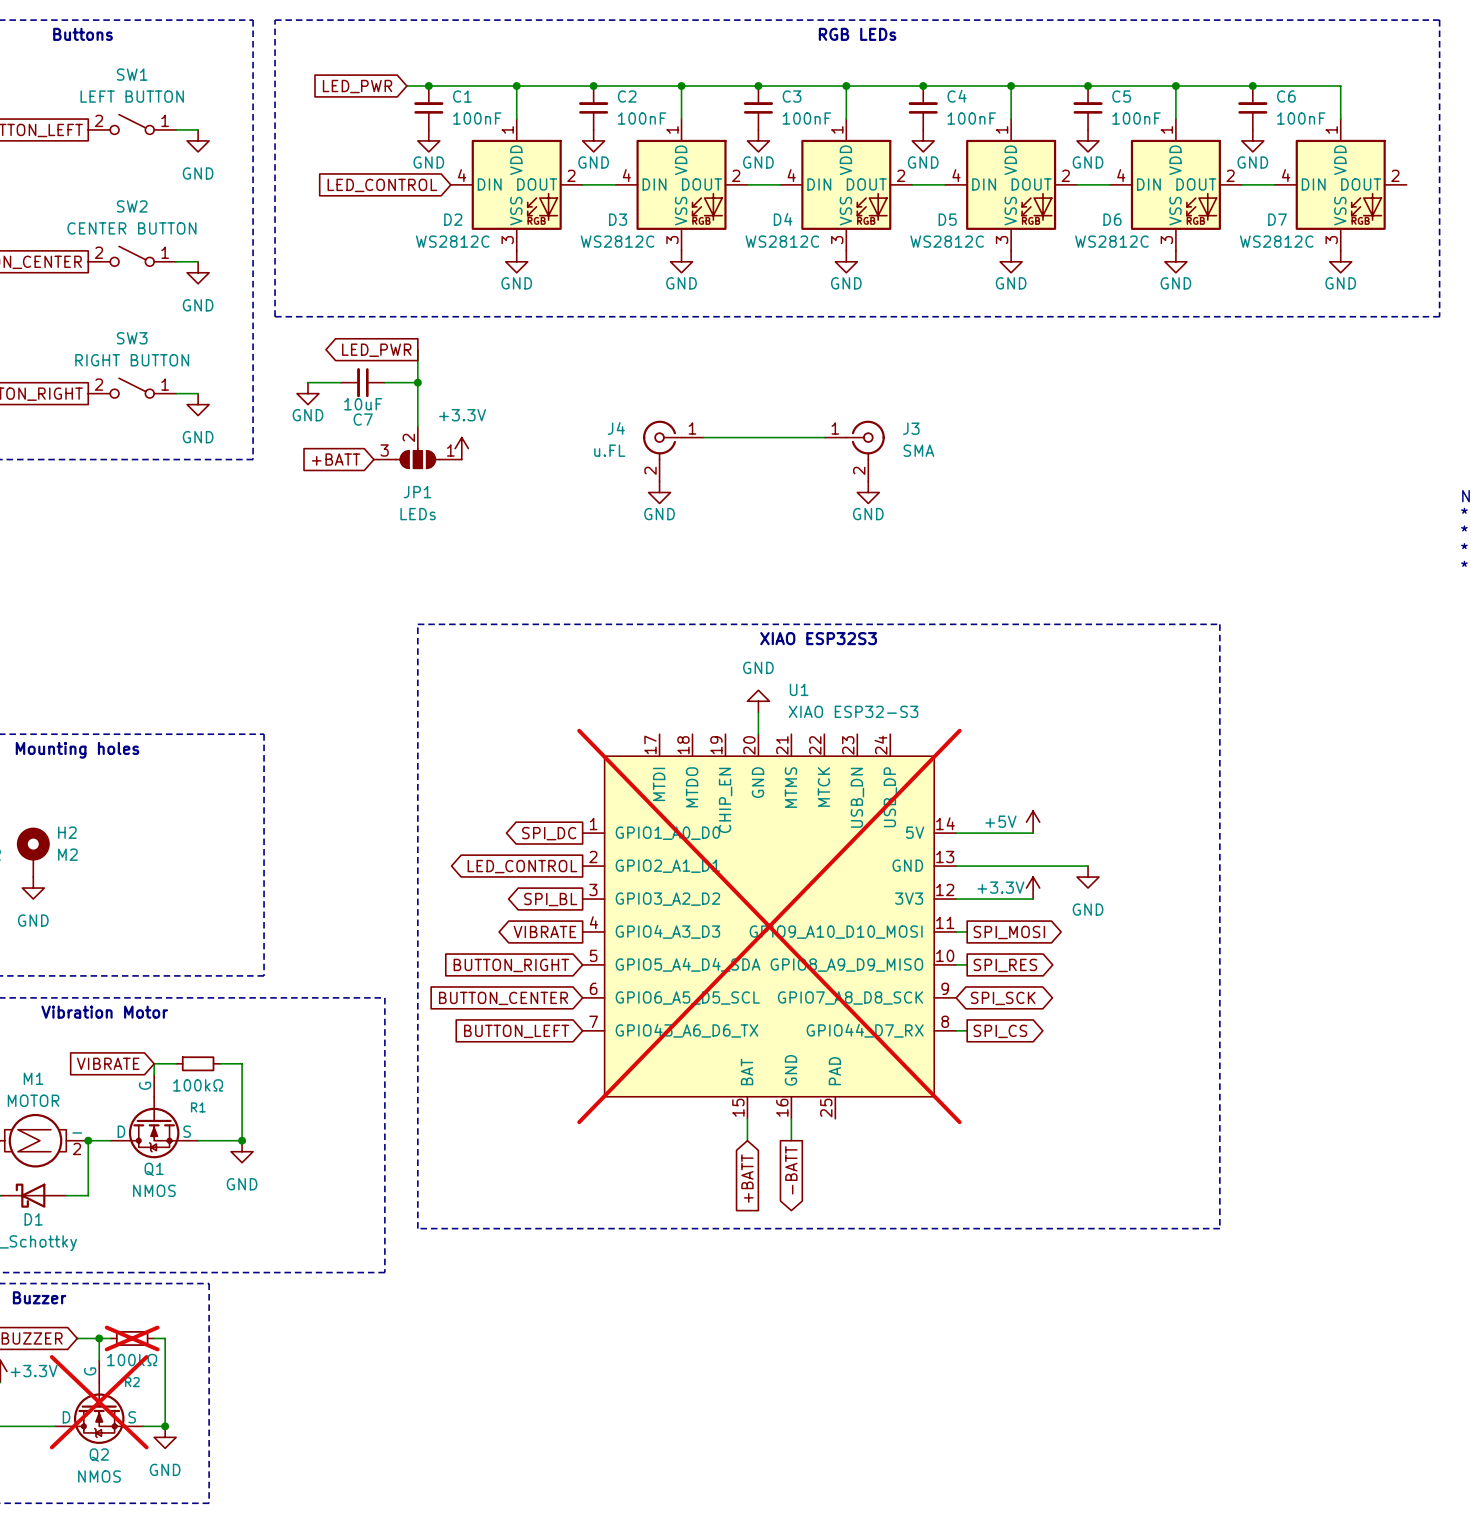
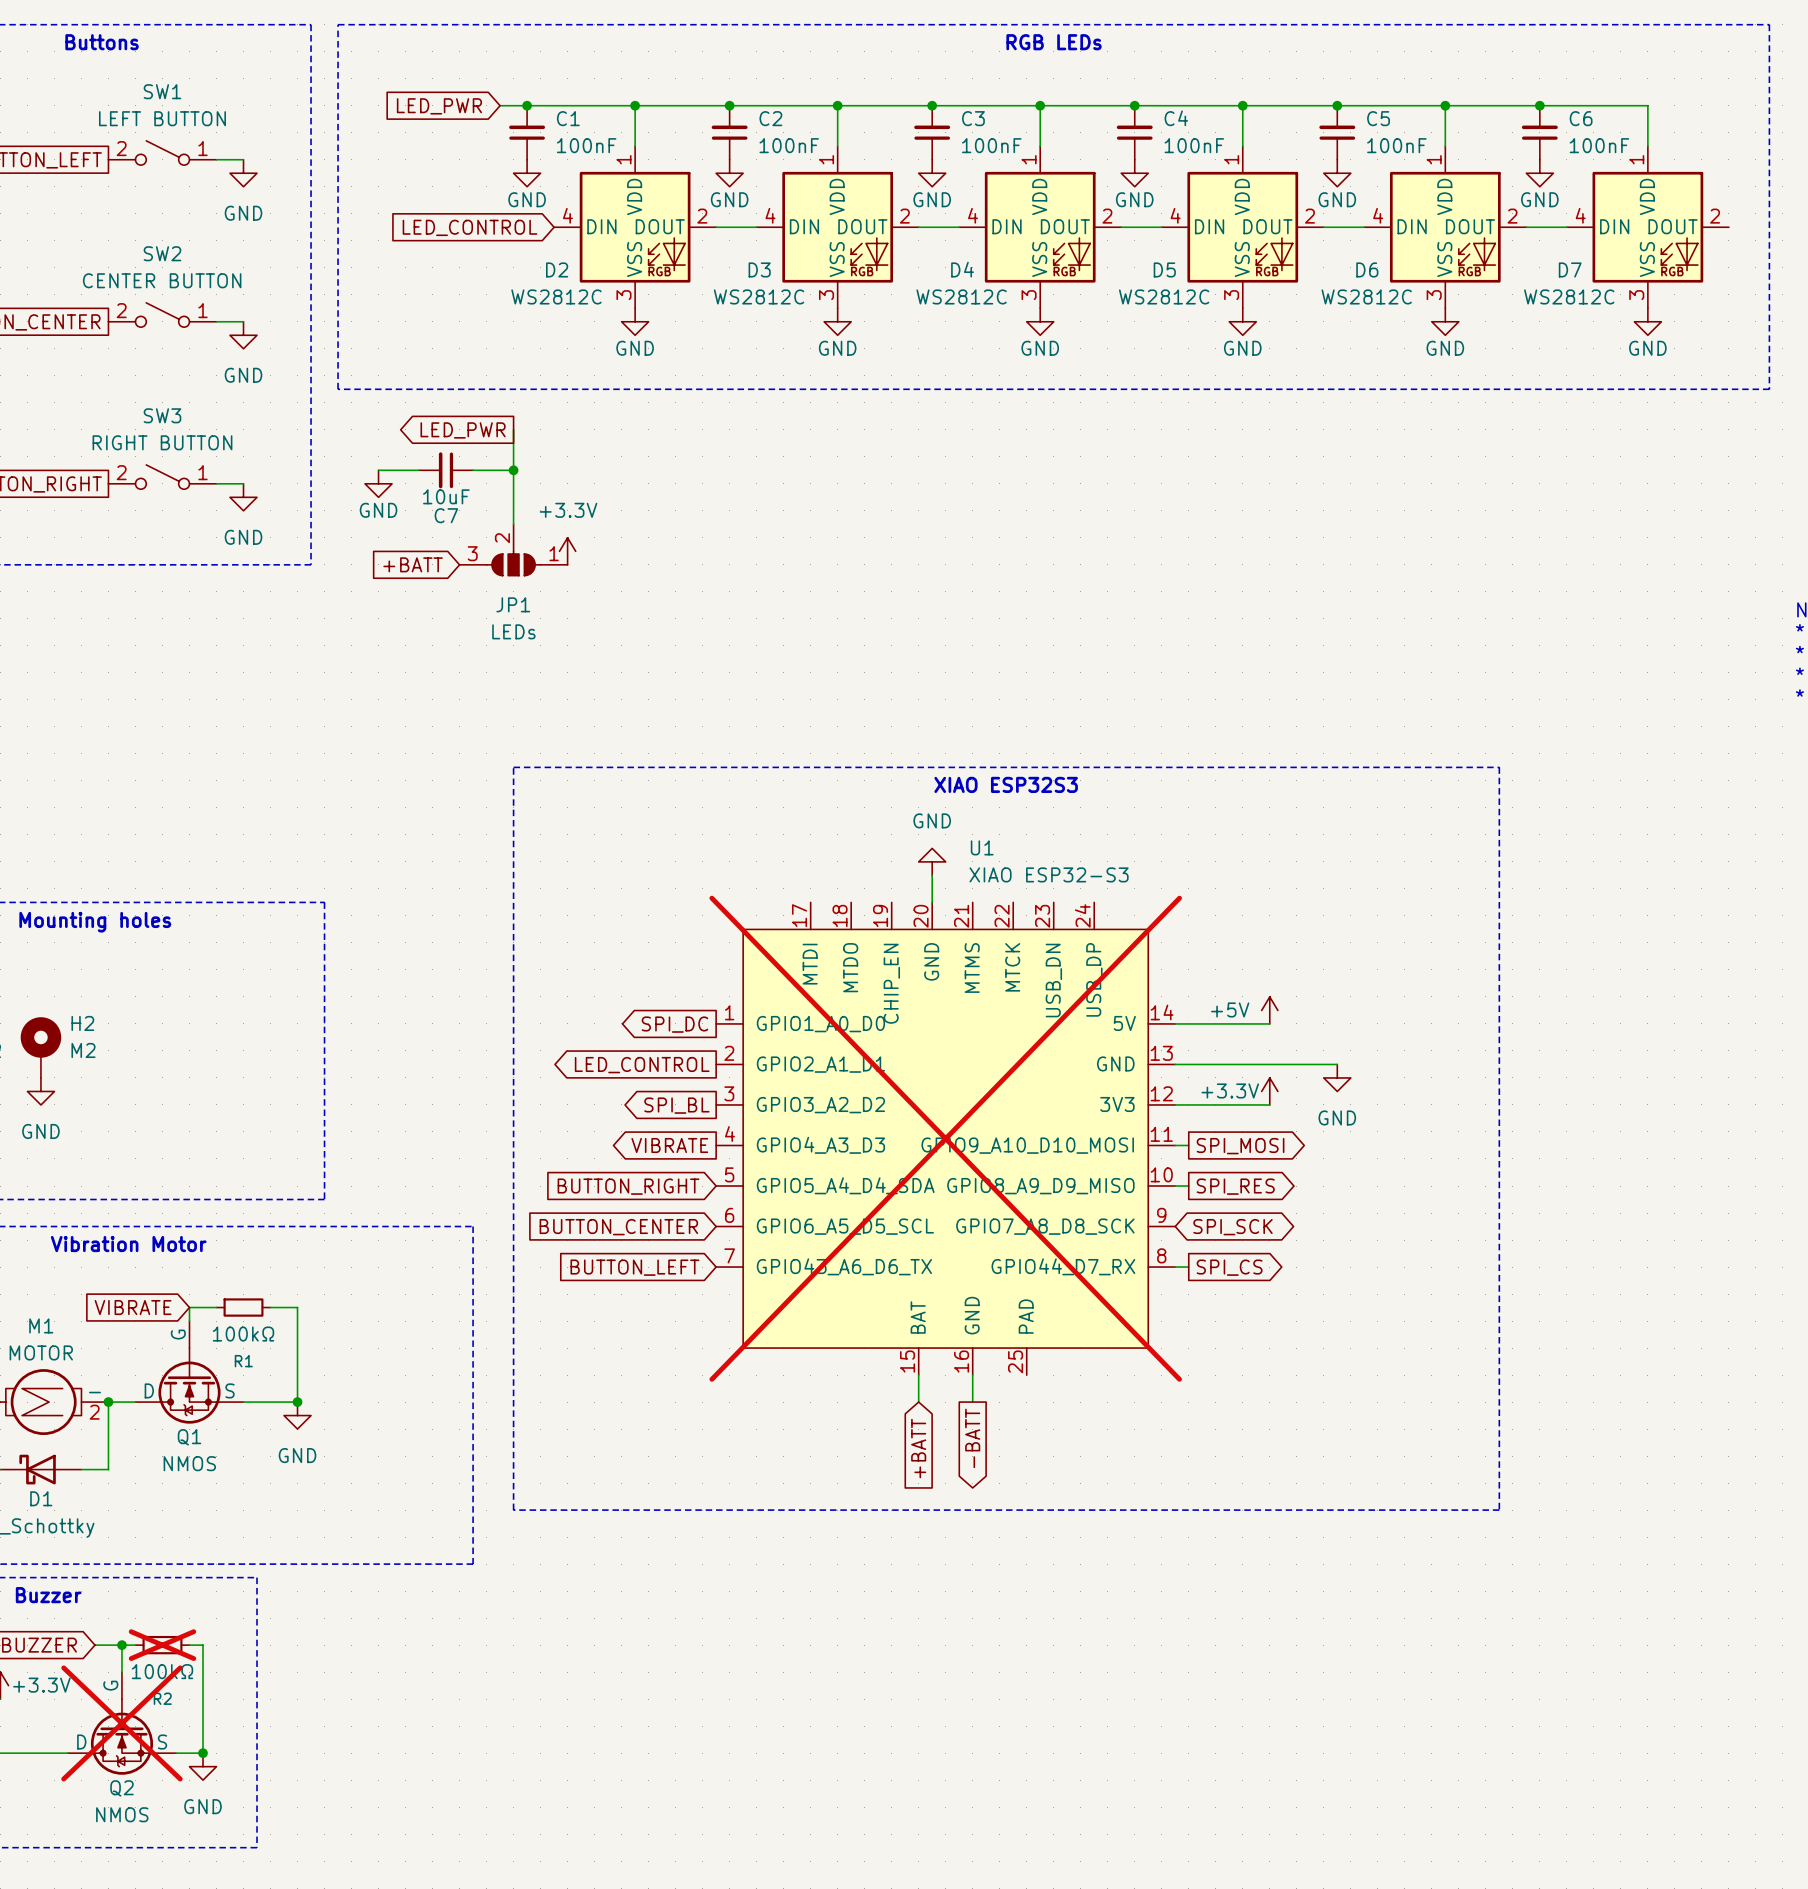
wire: (703, 437) (824, 437) -> none
J4: u.FL (673, 451) -> none
J3: SMA (854, 451) -> none
power symbol: GND (659, 492) -> none
power symbol: GND (868, 492) -> none

